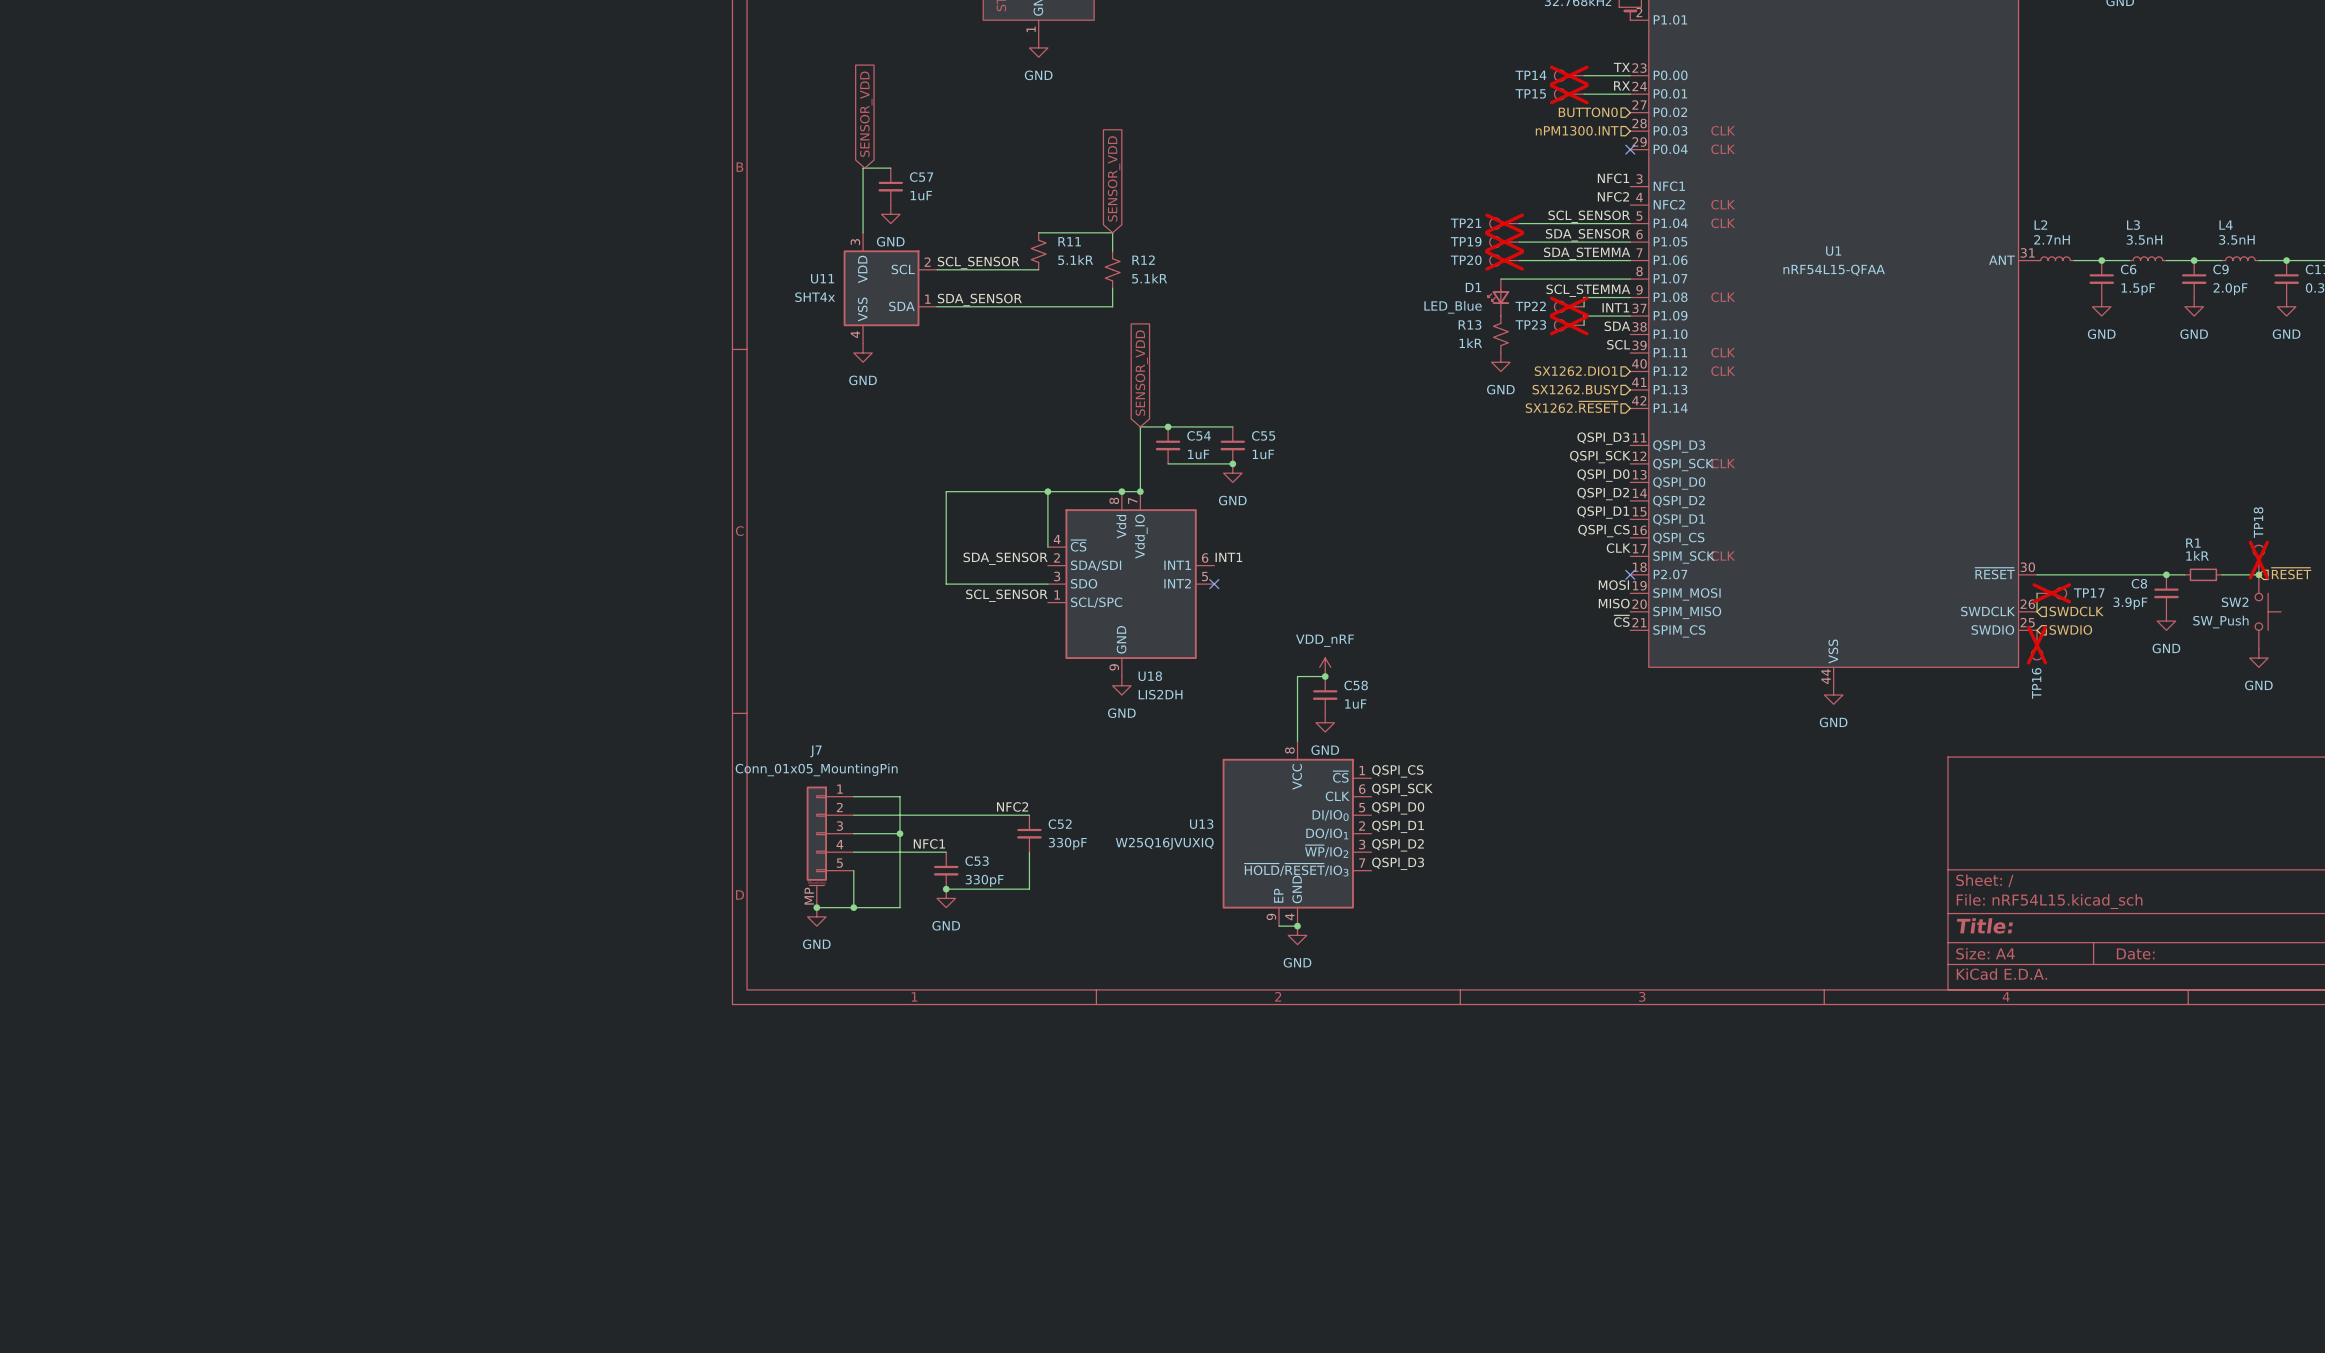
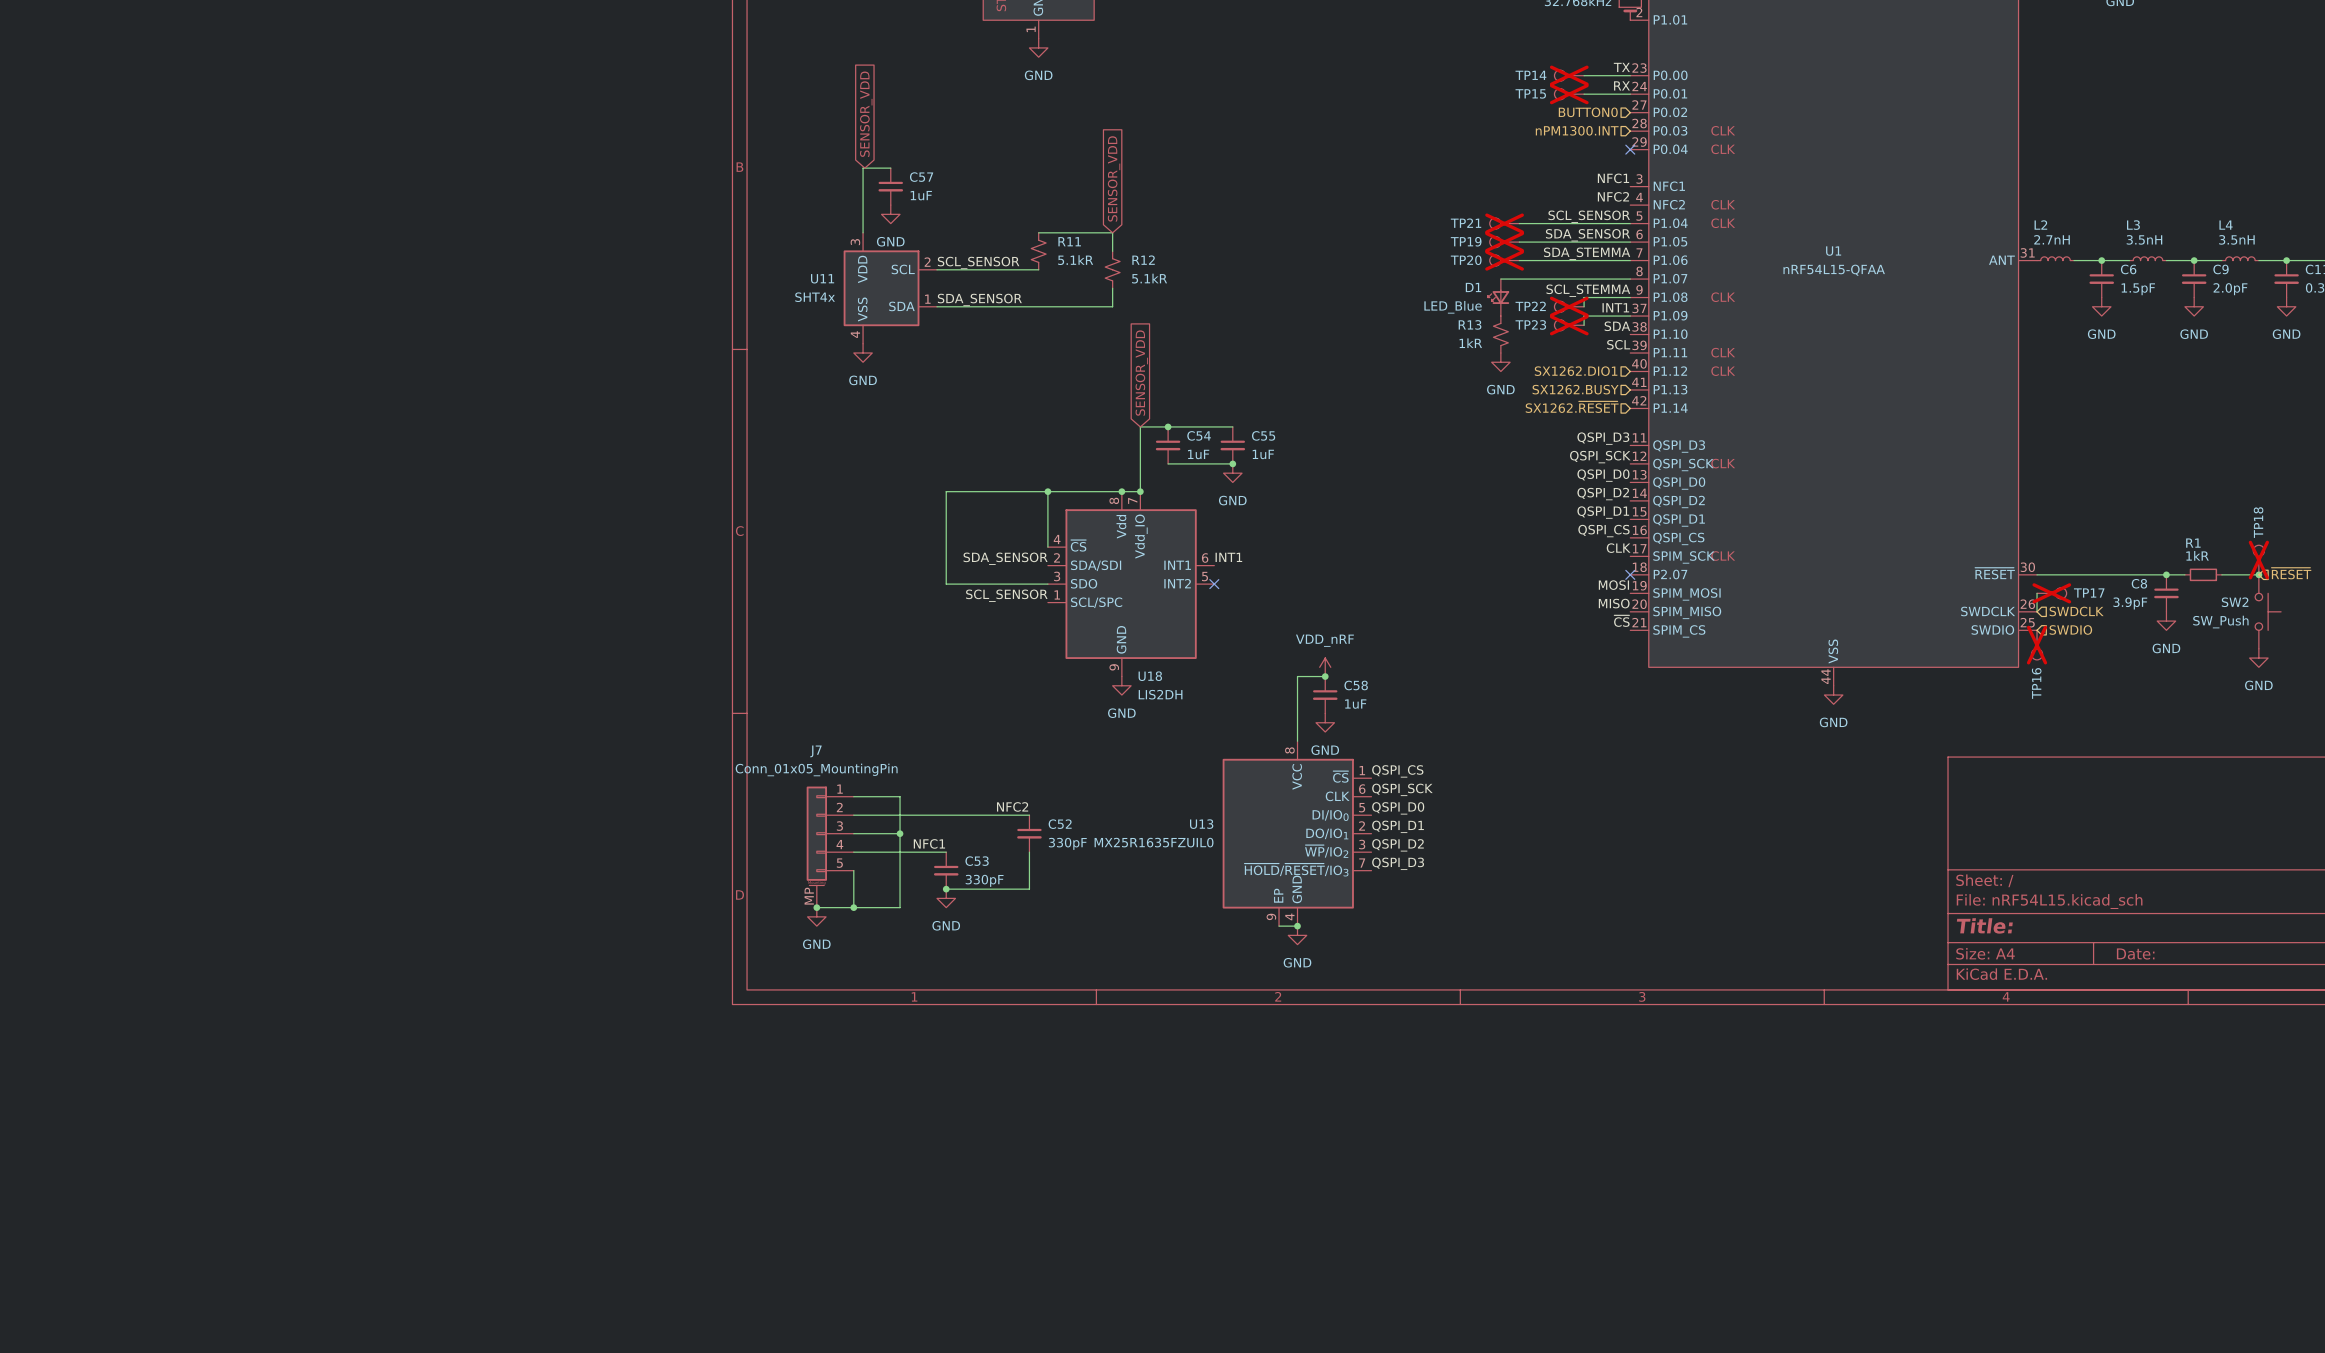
U13 value: W25Q16JVUXIQ (1164, 843) -> MX25R1635FZUIL0 (1154, 842)

